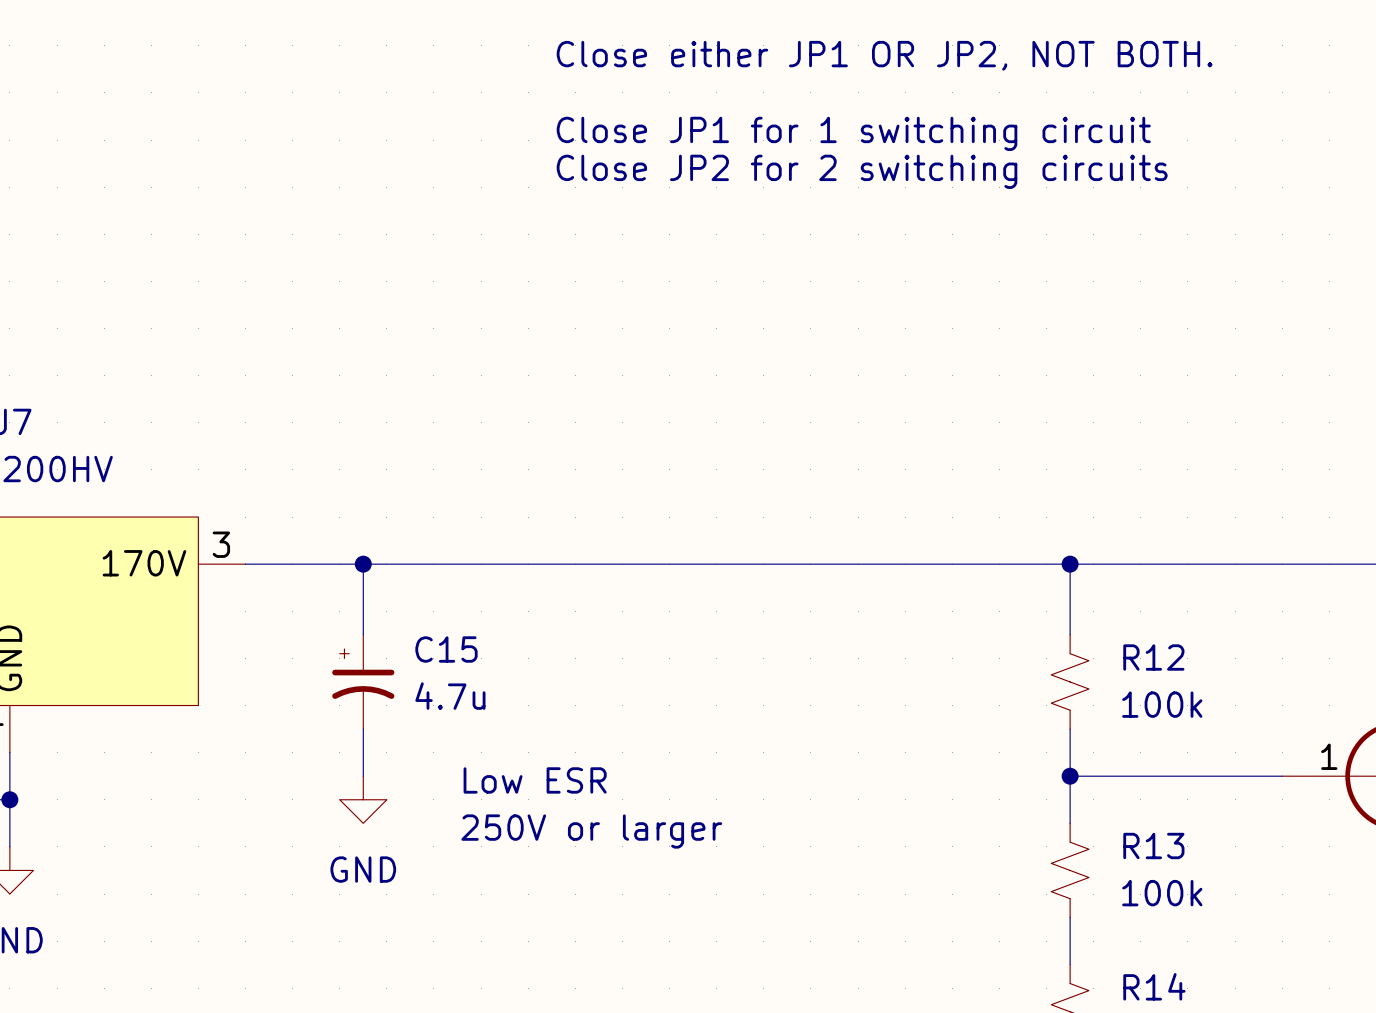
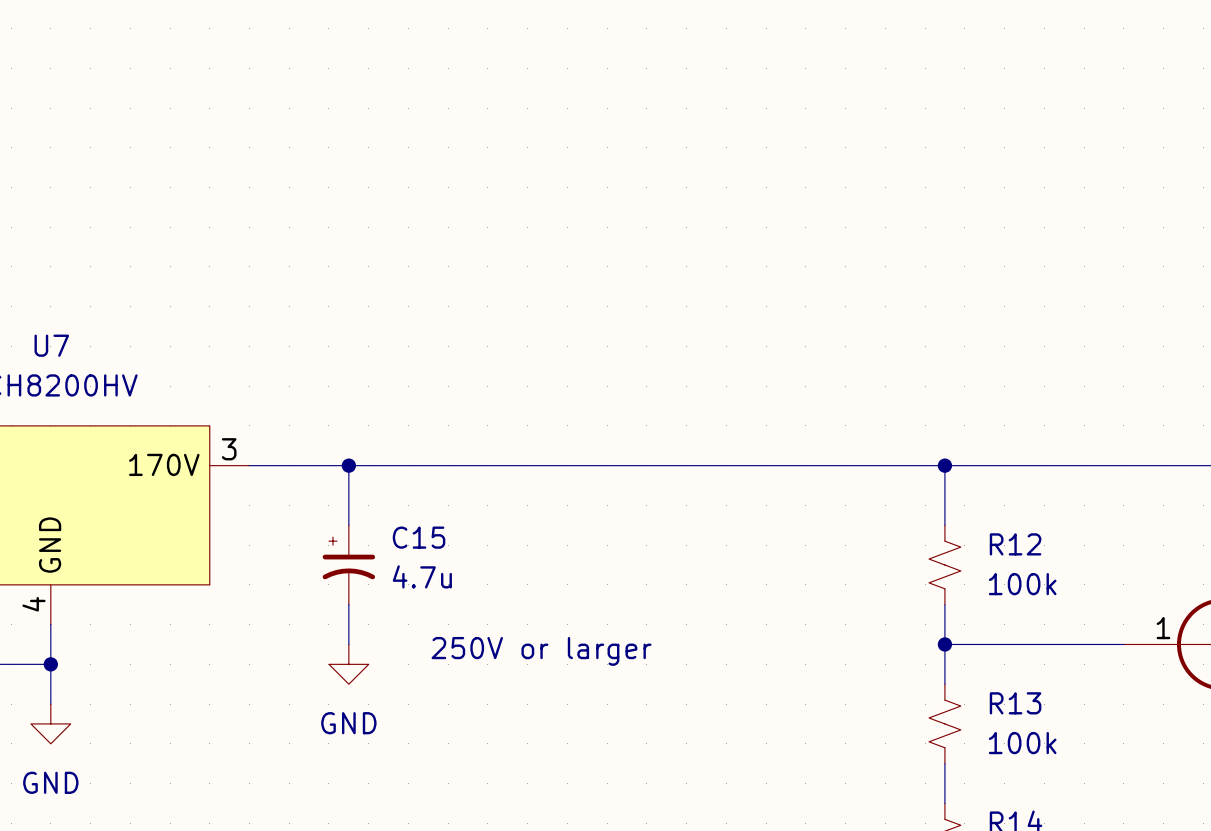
text: Close either JP1 OR JP2, NOT BOTH. (884, 55) -> none
text: Close JP1 for 1 switching circuit (853, 133) -> none
text: Close JP2 for 2 switching circuits (862, 171) -> none
text: Low ESR (535, 780) -> 250V or larger (541, 651)
text: 250V or larger (591, 831) -> none

